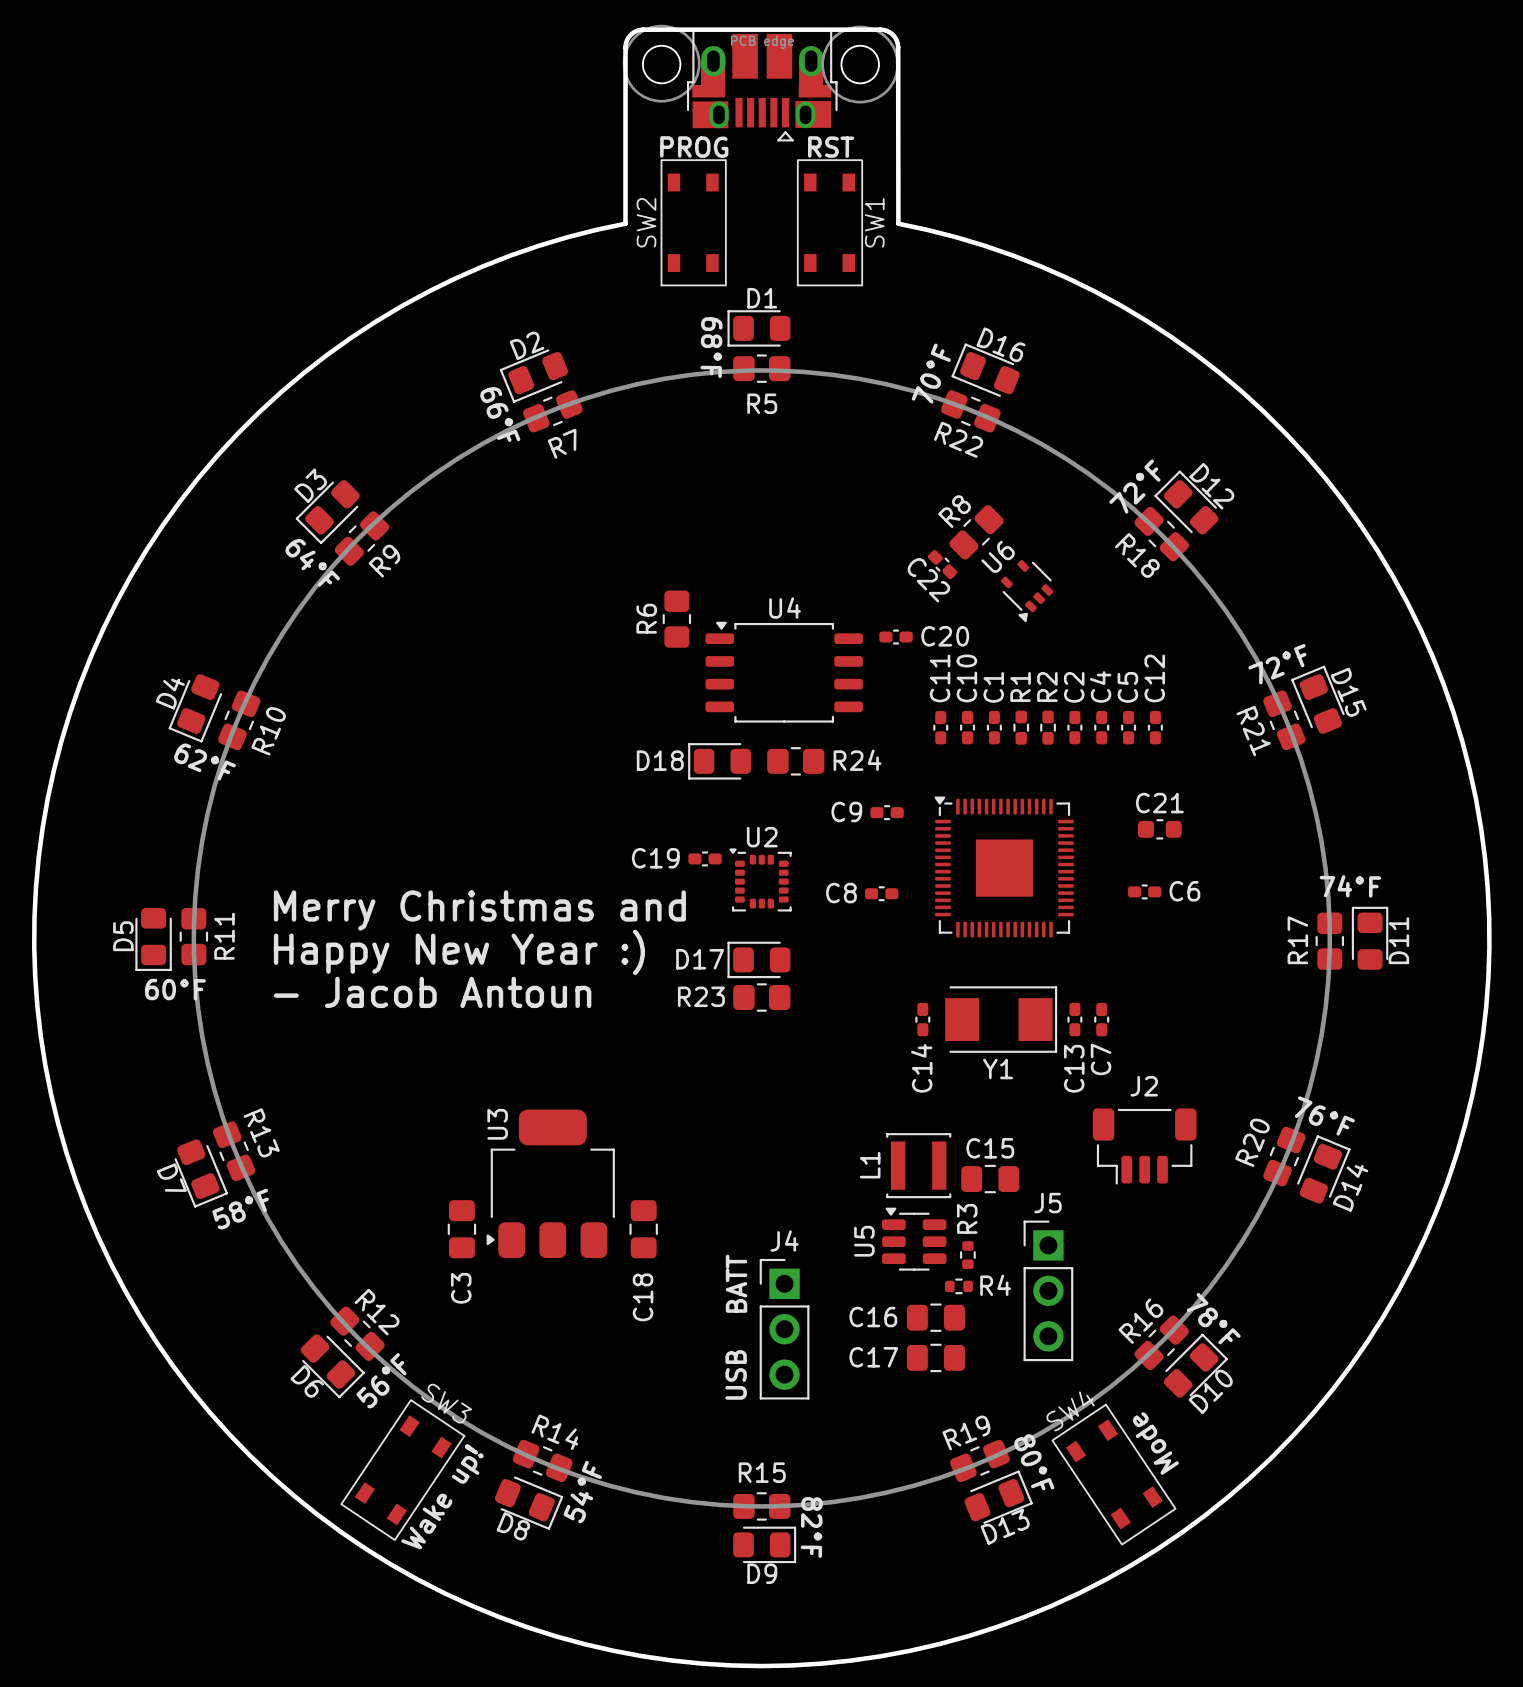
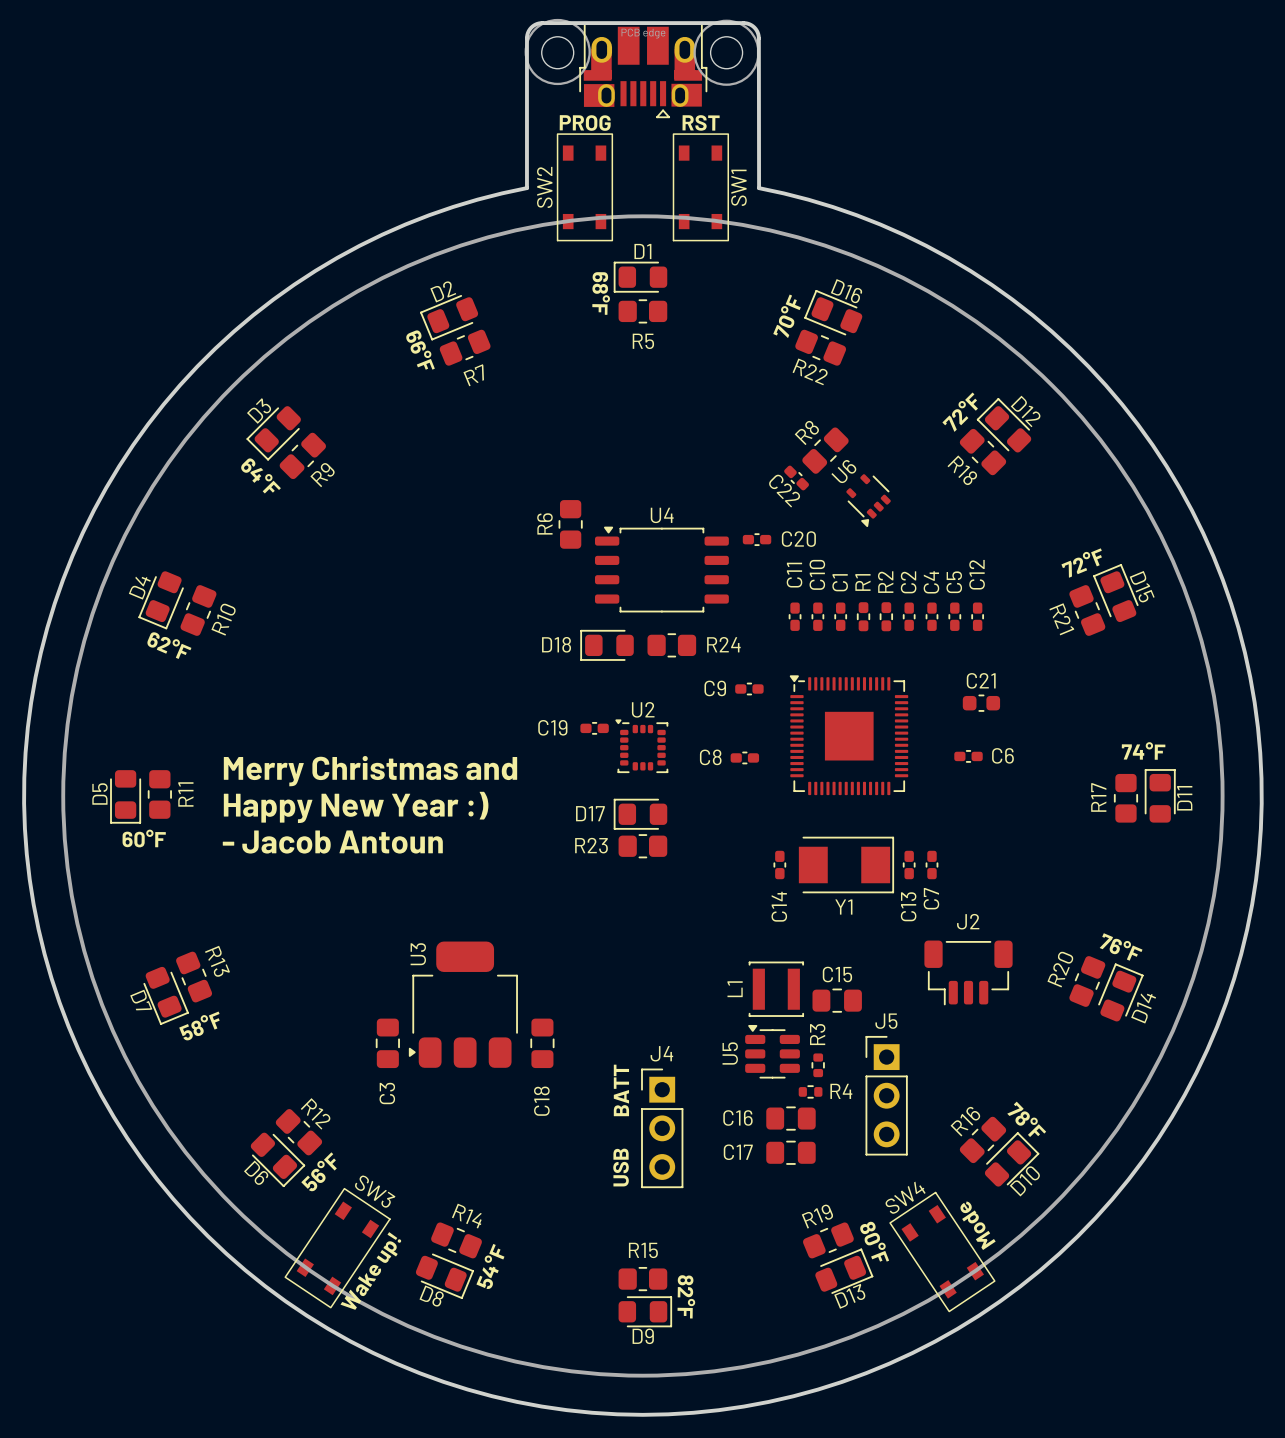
drawing shape: [191, 368, 1333, 1509] -> [61, 214, 1225, 1378]

